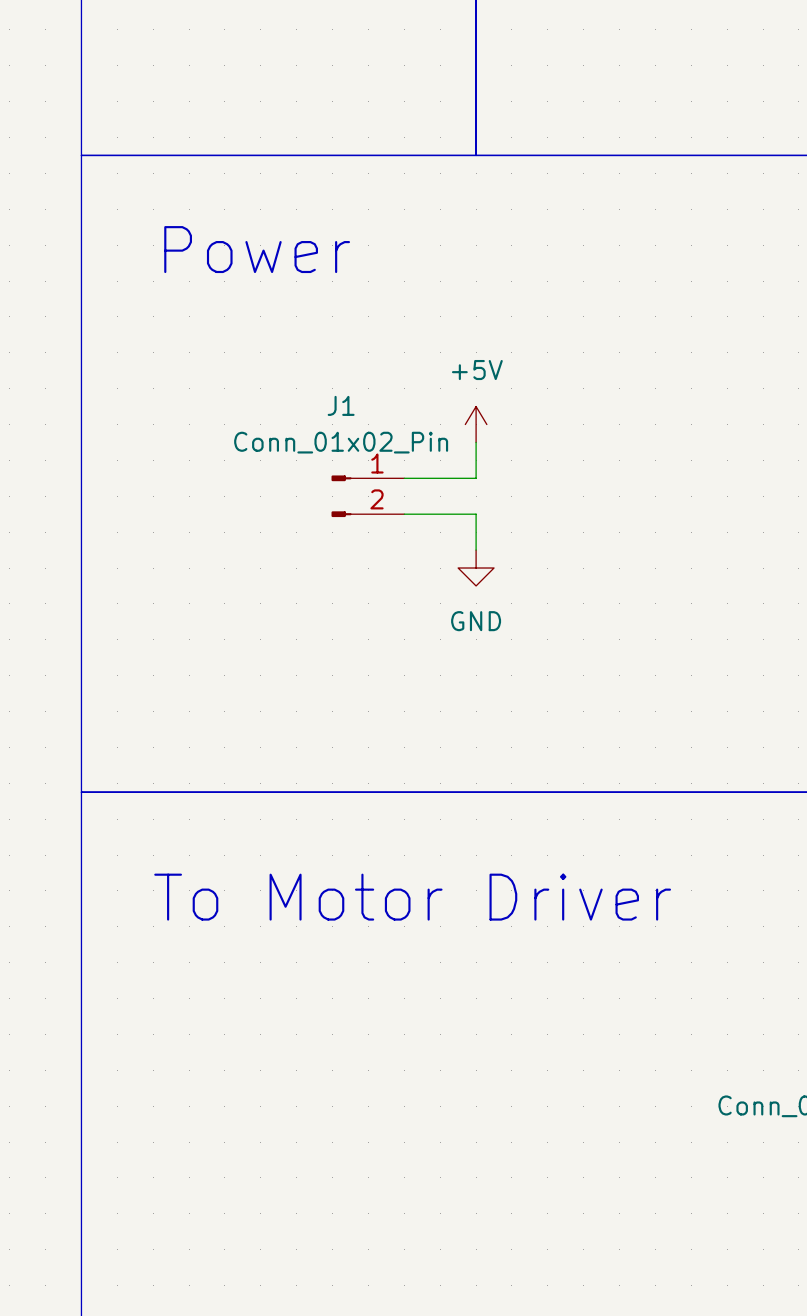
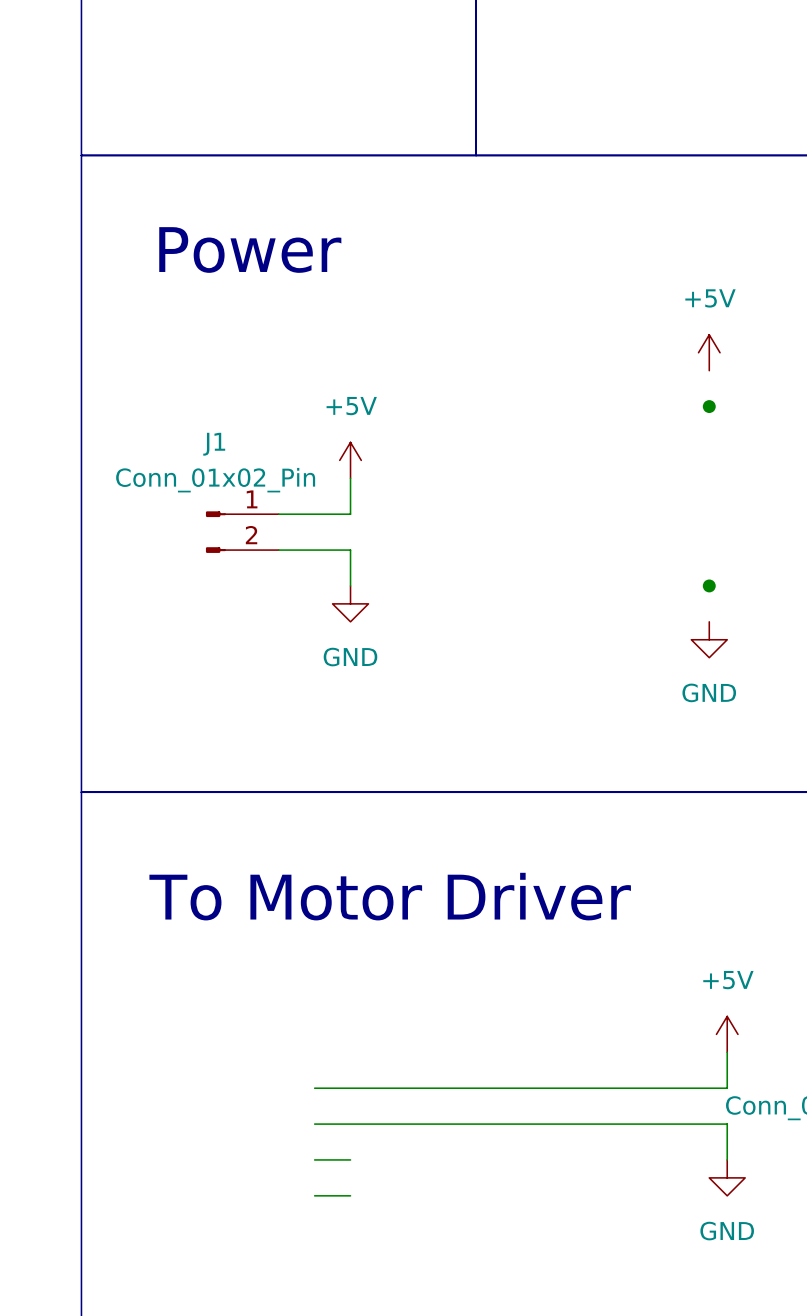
power symbol: none -> +5V (709, 352)
junction: none -> (709, 406)
power symbol: +5V (476, 424) -> none
wire: (476, 442) (476, 478) (404, 478) -> (350, 478) (350, 514) (278, 514)
power symbol: none -> +5V (350, 460)
J1 position: (367, 496) -> (242, 532)
wire: (404, 514) (476, 514) (476, 550) -> (278, 550) (350, 550) (350, 585)
power symbol: GND (476, 568) -> none
junction: none -> (709, 585)
power symbol: none -> GND (350, 603)
power symbol: none -> GND (709, 639)
power symbol: none -> +5V (727, 1034)
wire: none -> (727, 1052) (727, 1088) (314, 1088)
wire: none -> (314, 1124) (727, 1124) (727, 1159)
wire: none -> (314, 1159) (350, 1159)
power symbol: none -> GND (727, 1177)
wire: none -> (314, 1195) (350, 1195)

